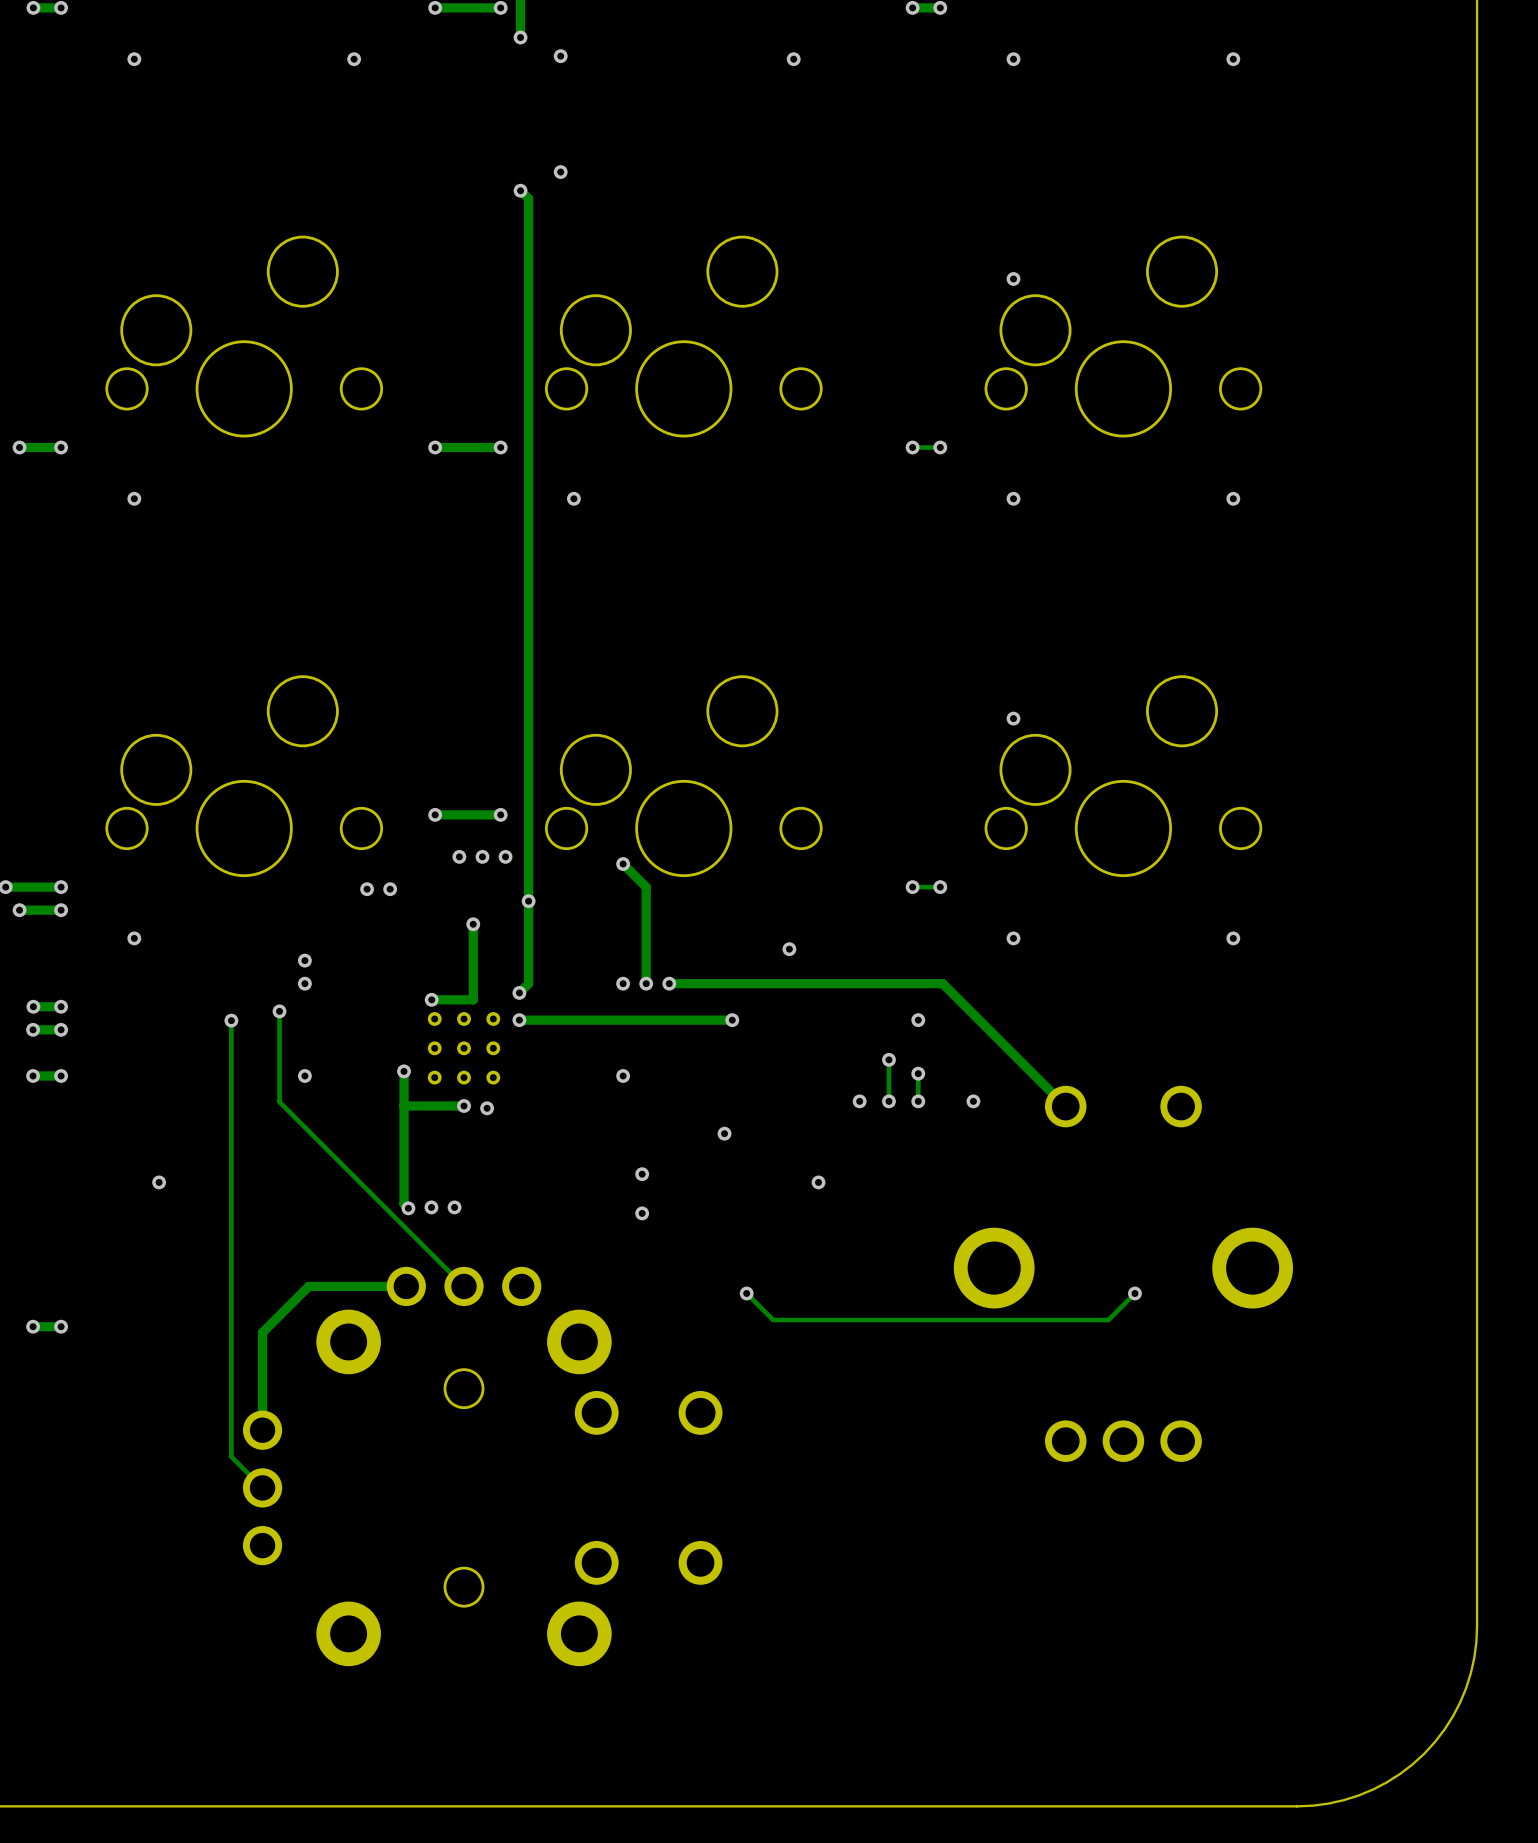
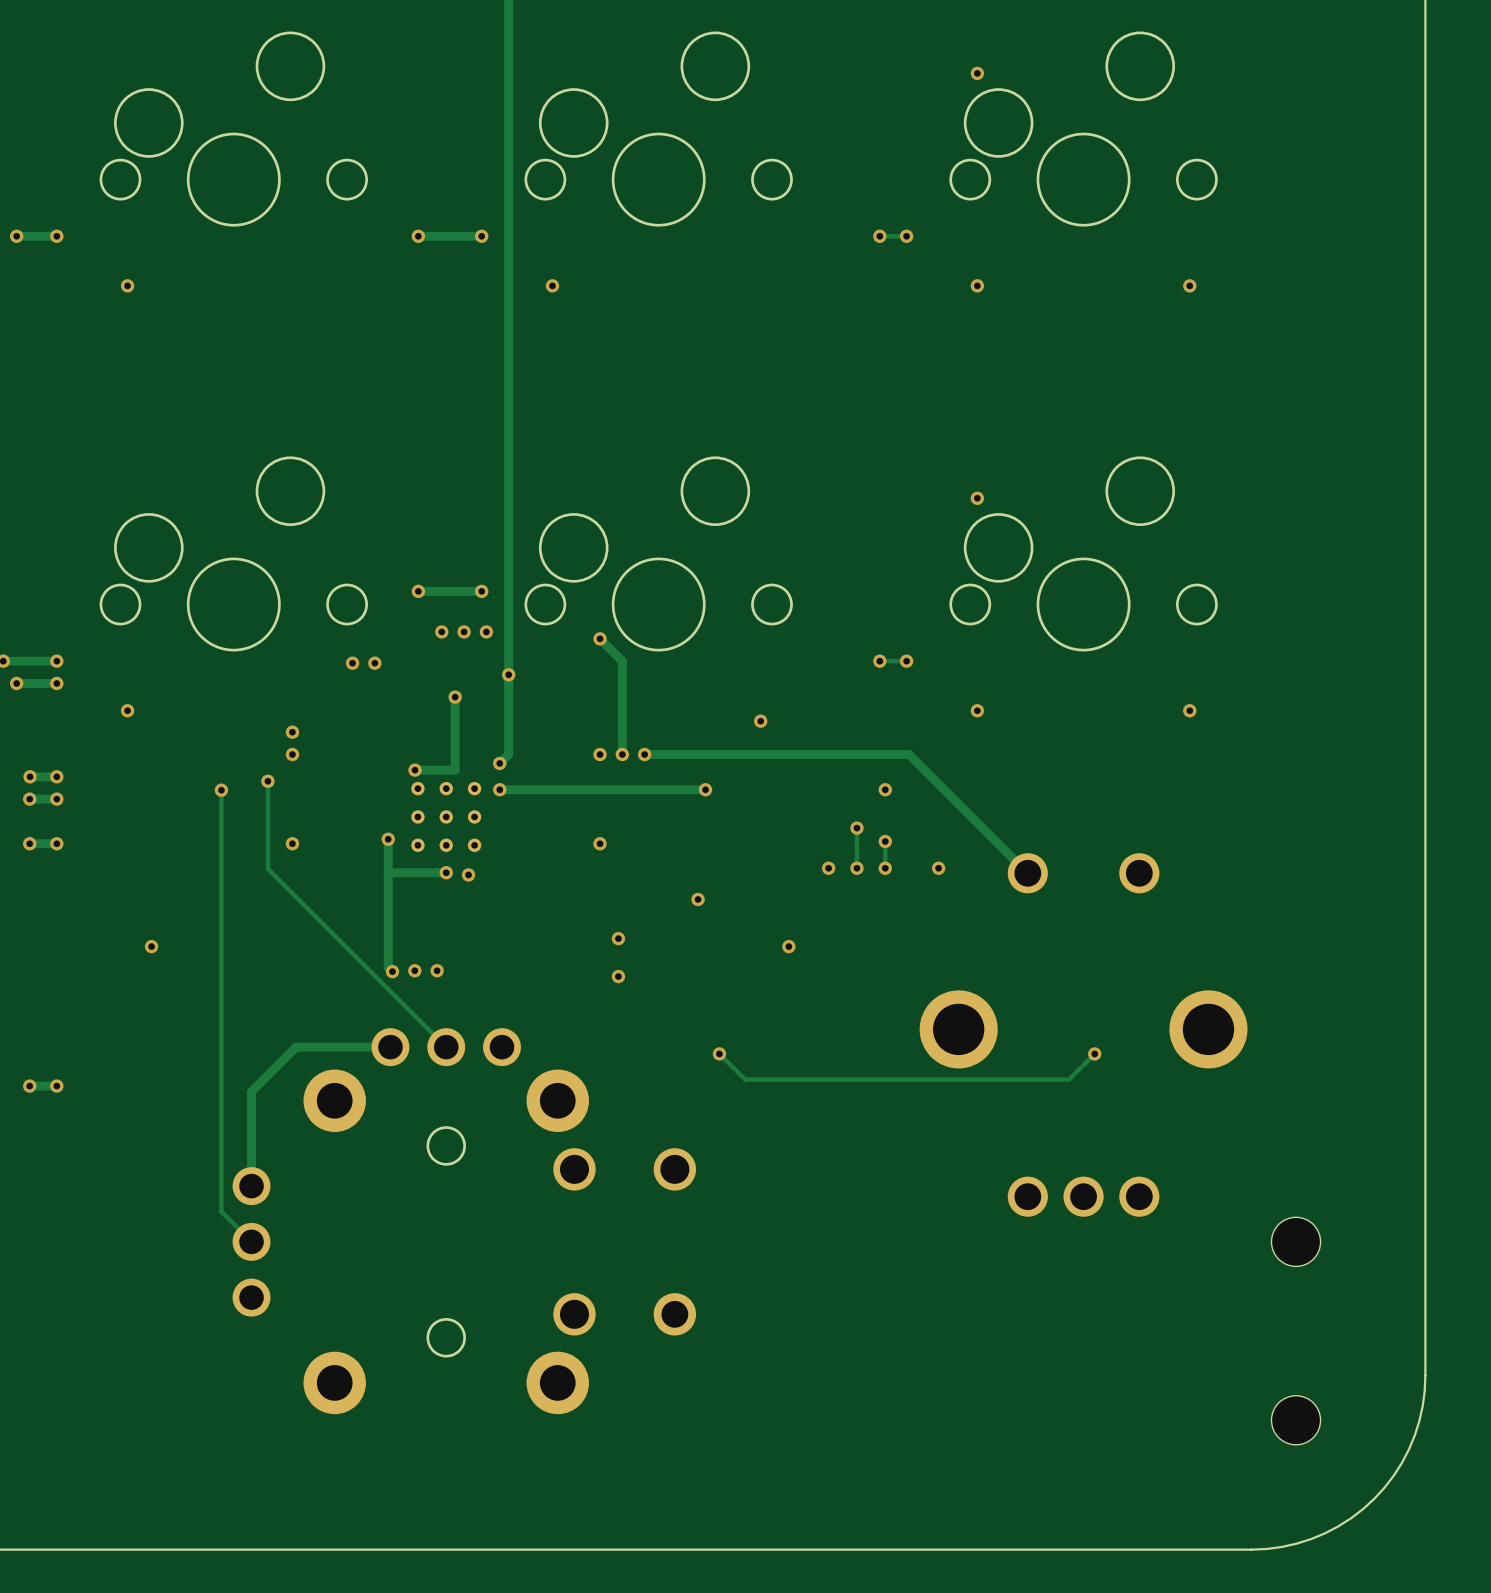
part: none -> (1296, 1241)
part: none -> (1296, 1420)

